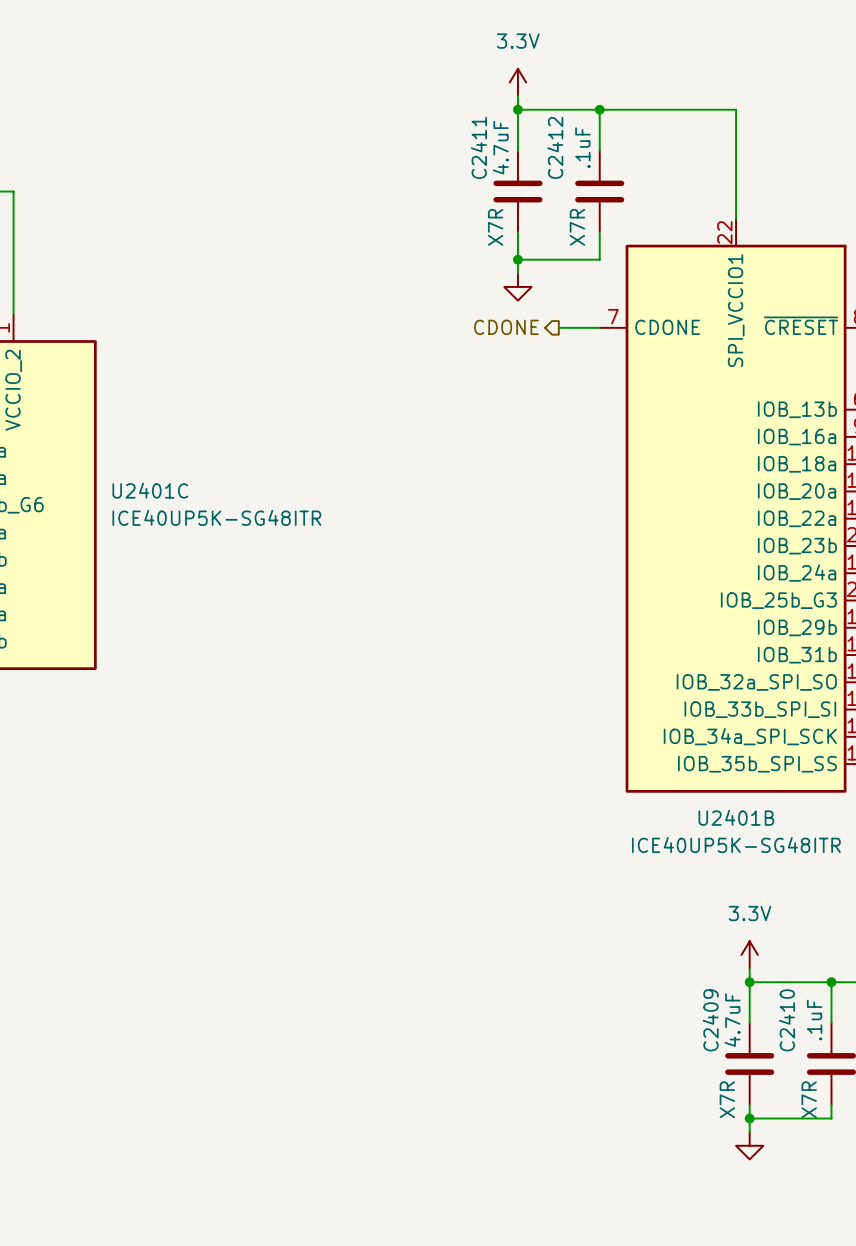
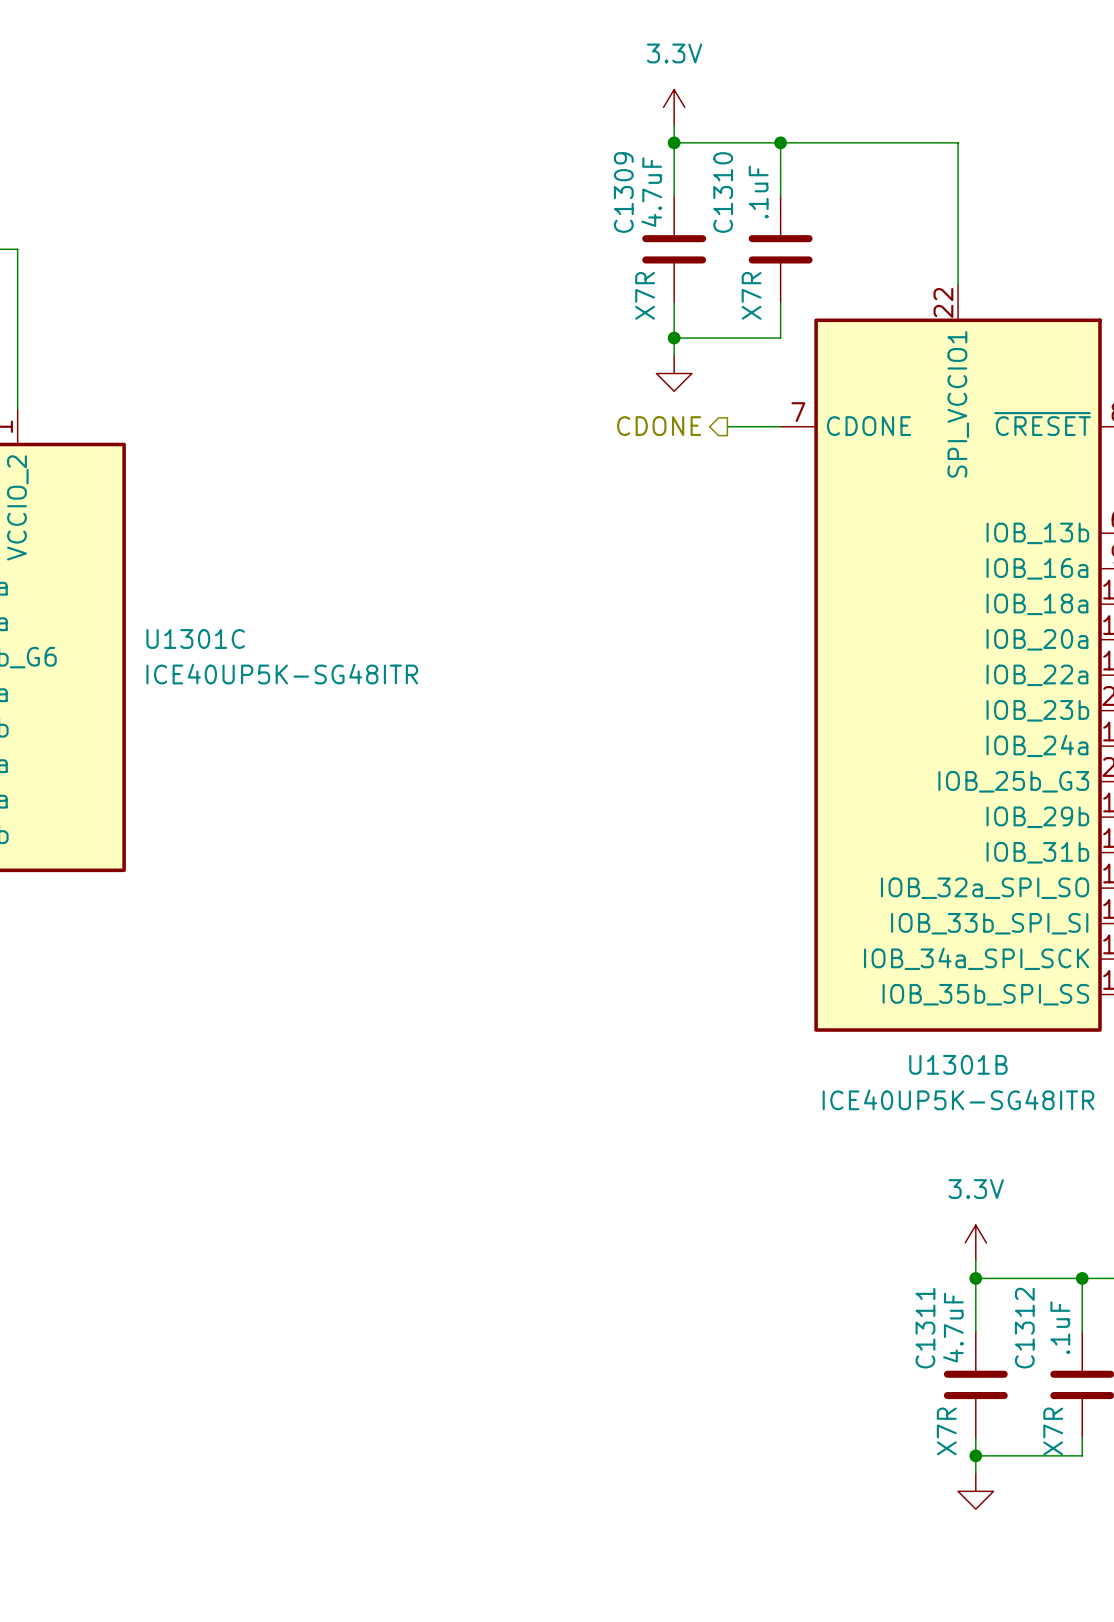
C2411 name: C2411 (478, 147) -> C1309 (623, 192)
C2412 name: C2412 (555, 147) -> C1310 (723, 192)
U2401C name: U2401C (150, 490) -> U1301C (195, 639)
U2401B name: U2401B (736, 817) -> U1301B (958, 1064)
C2409 name: C2409 (710, 1020) -> C1311 (925, 1328)
C2410 name: C2410 (787, 1020) -> C1312 (1024, 1328)

